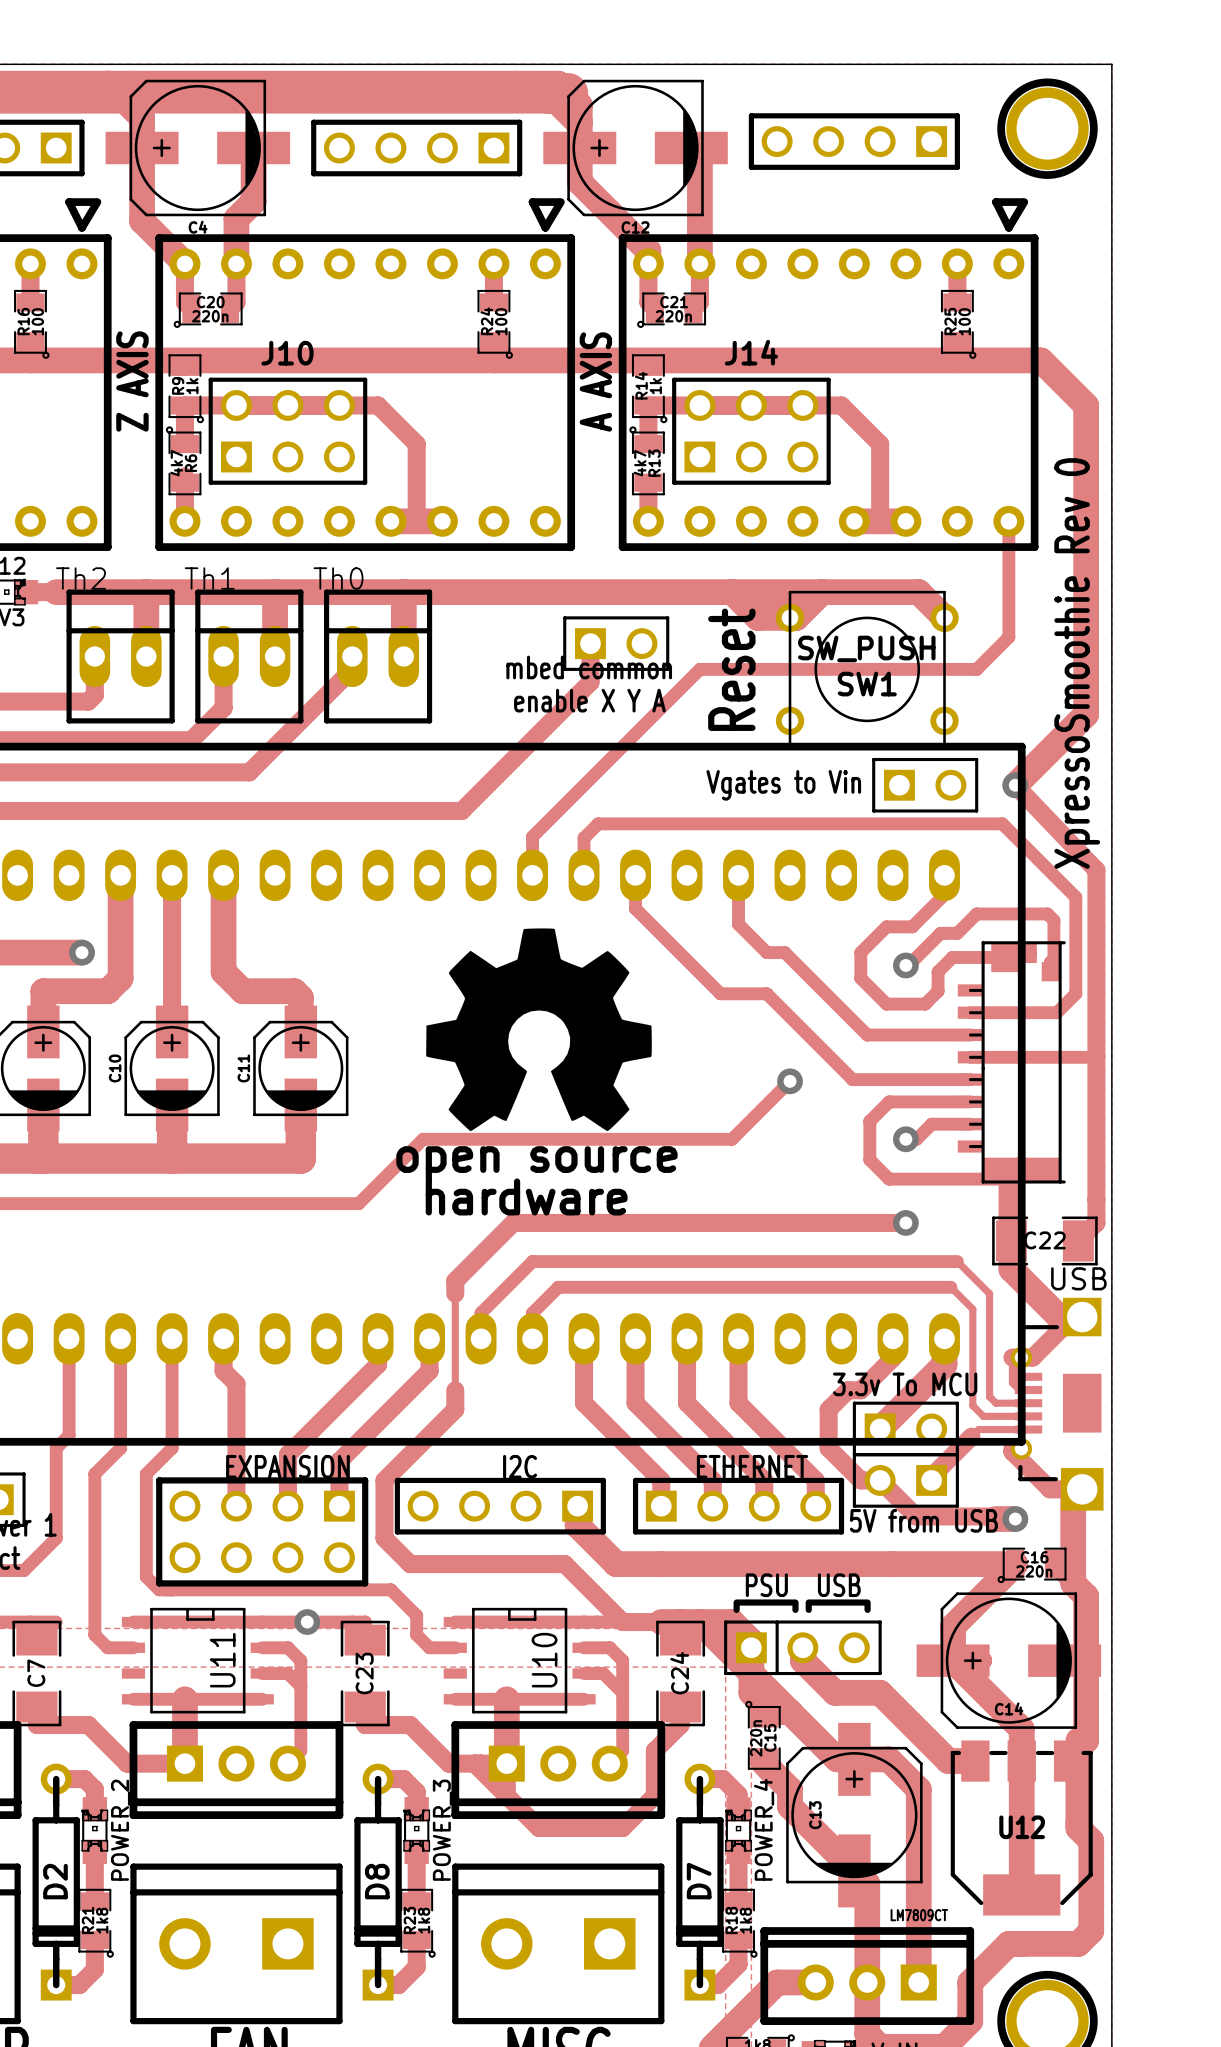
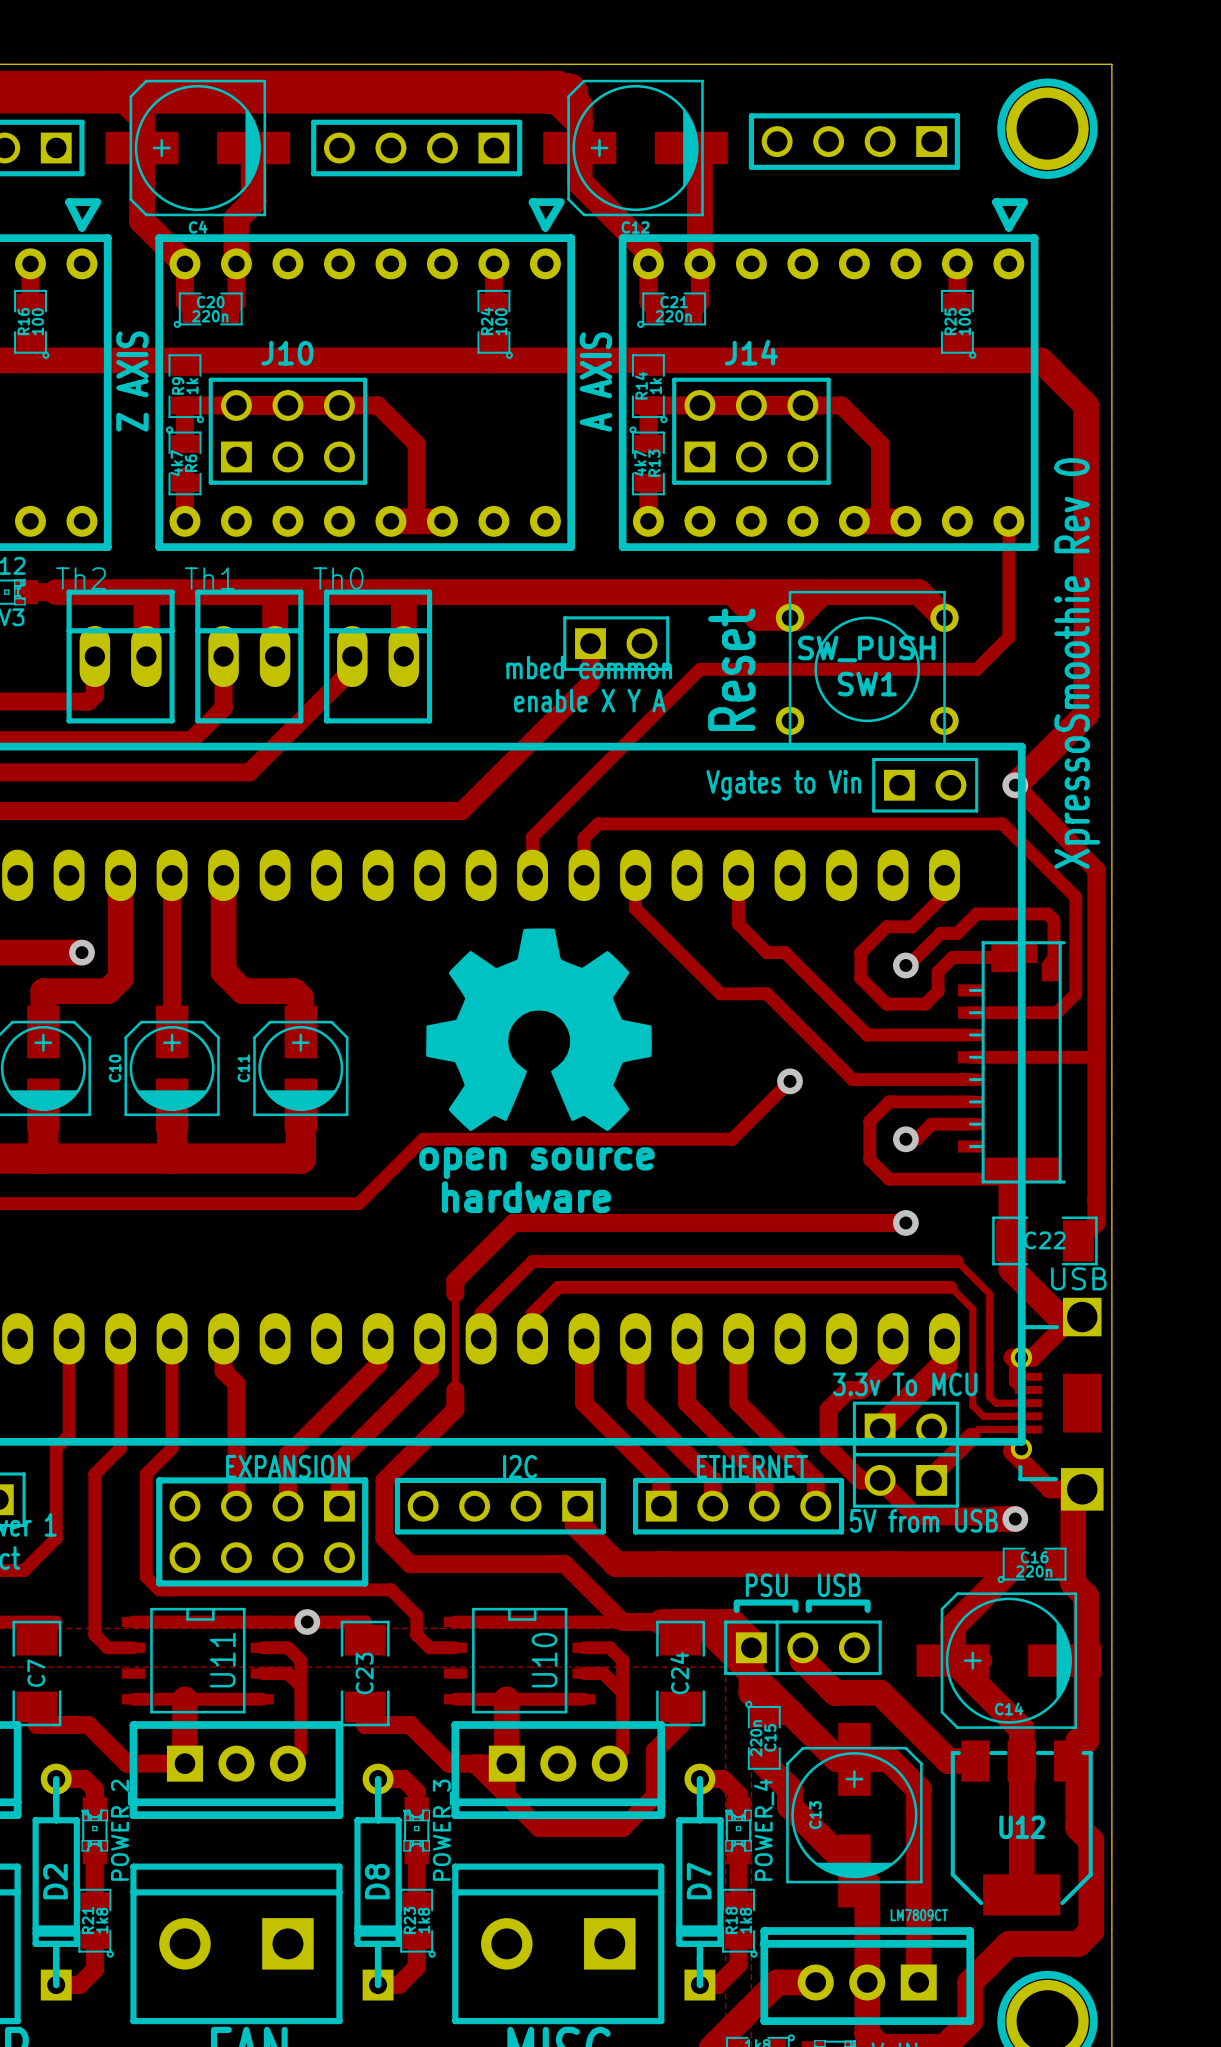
drawing shape: [396, 928, 678, 1216] -> [419, 928, 655, 1214]

